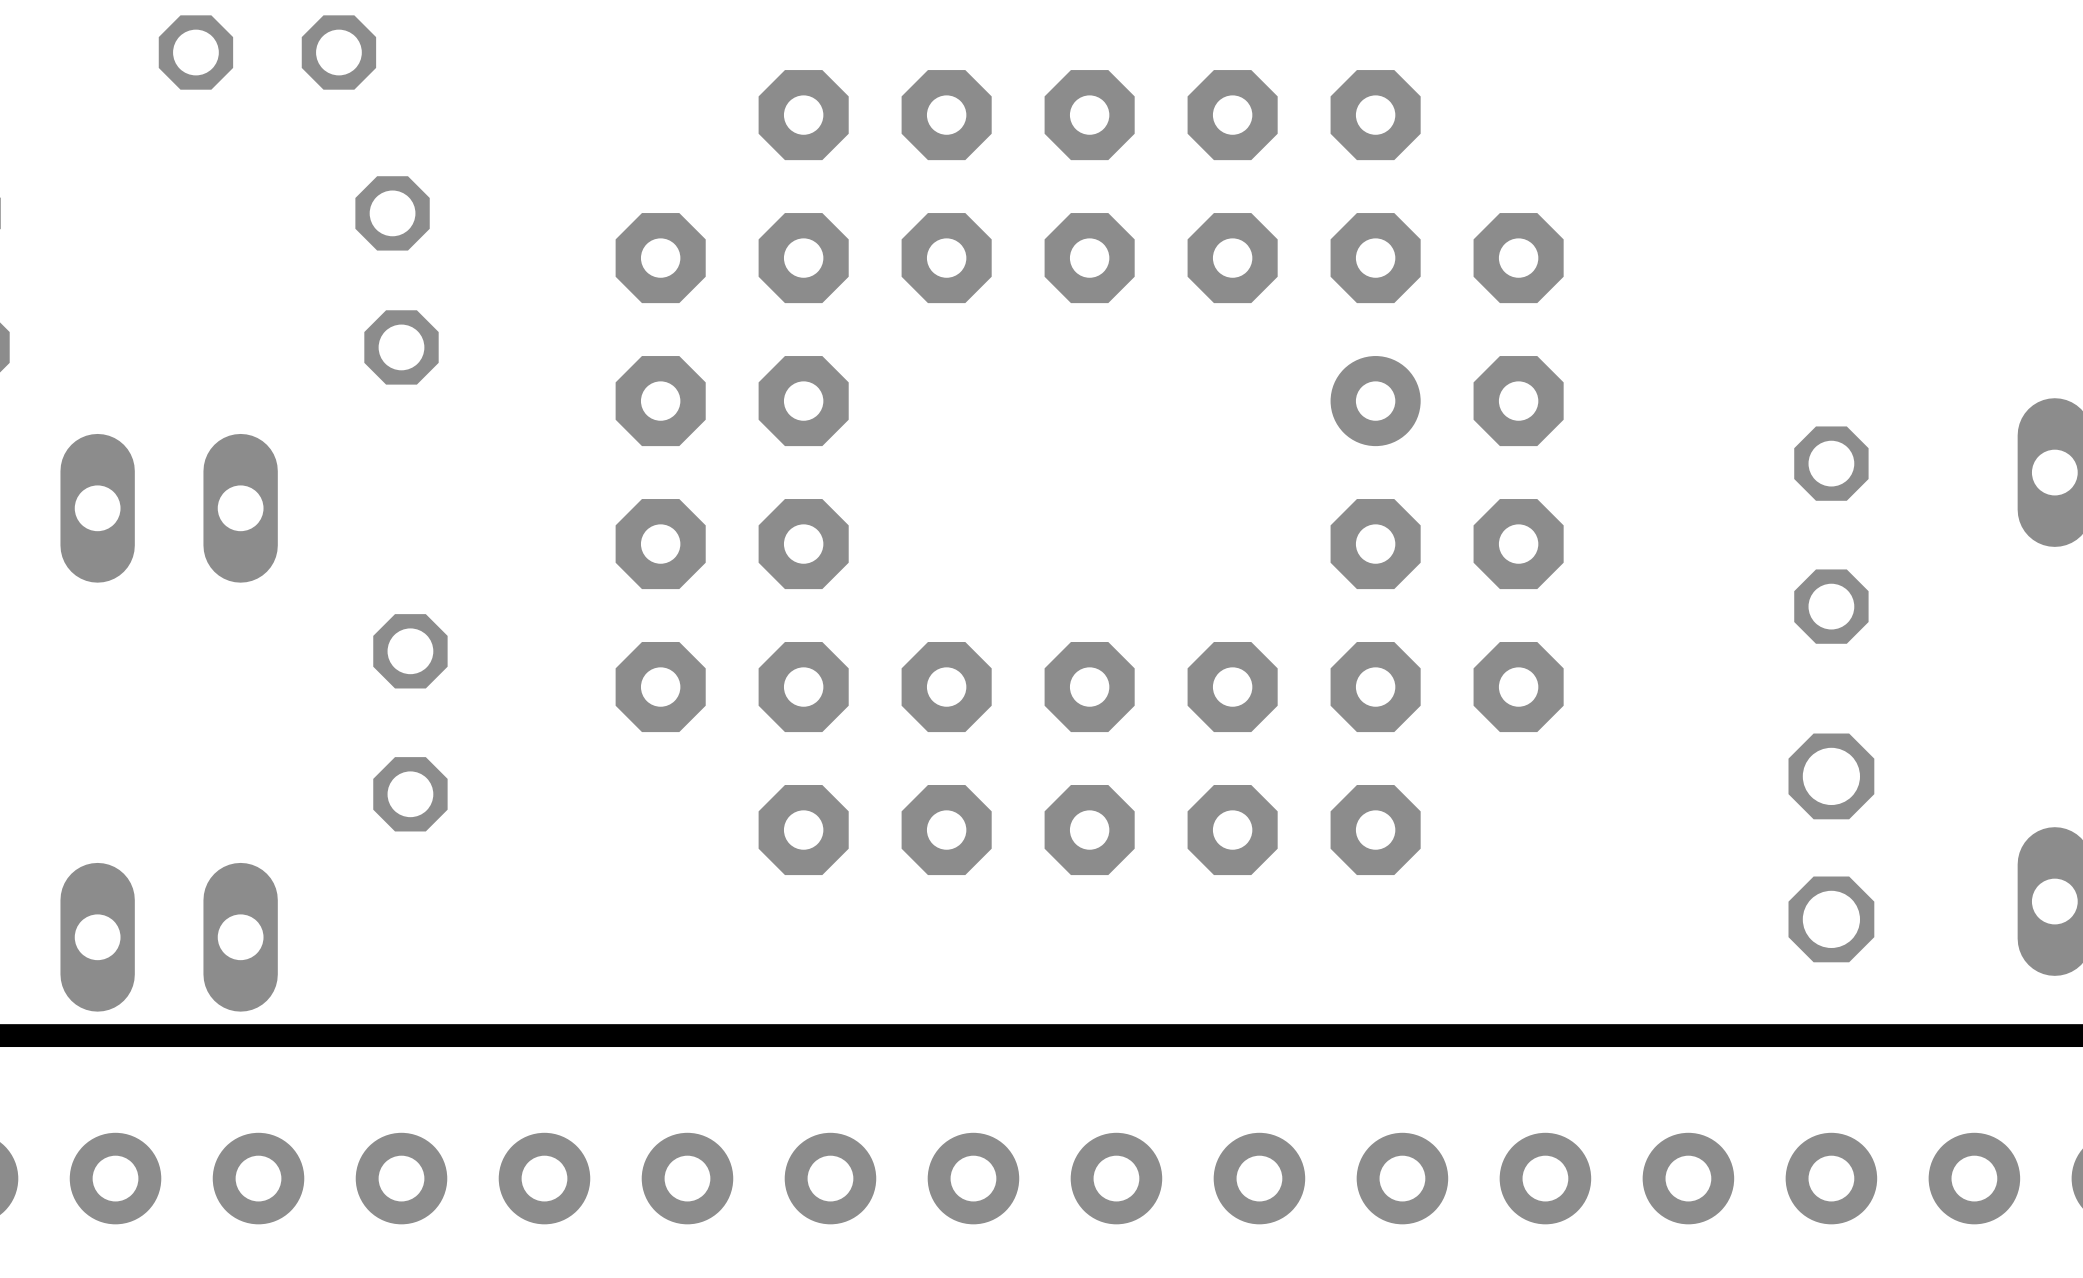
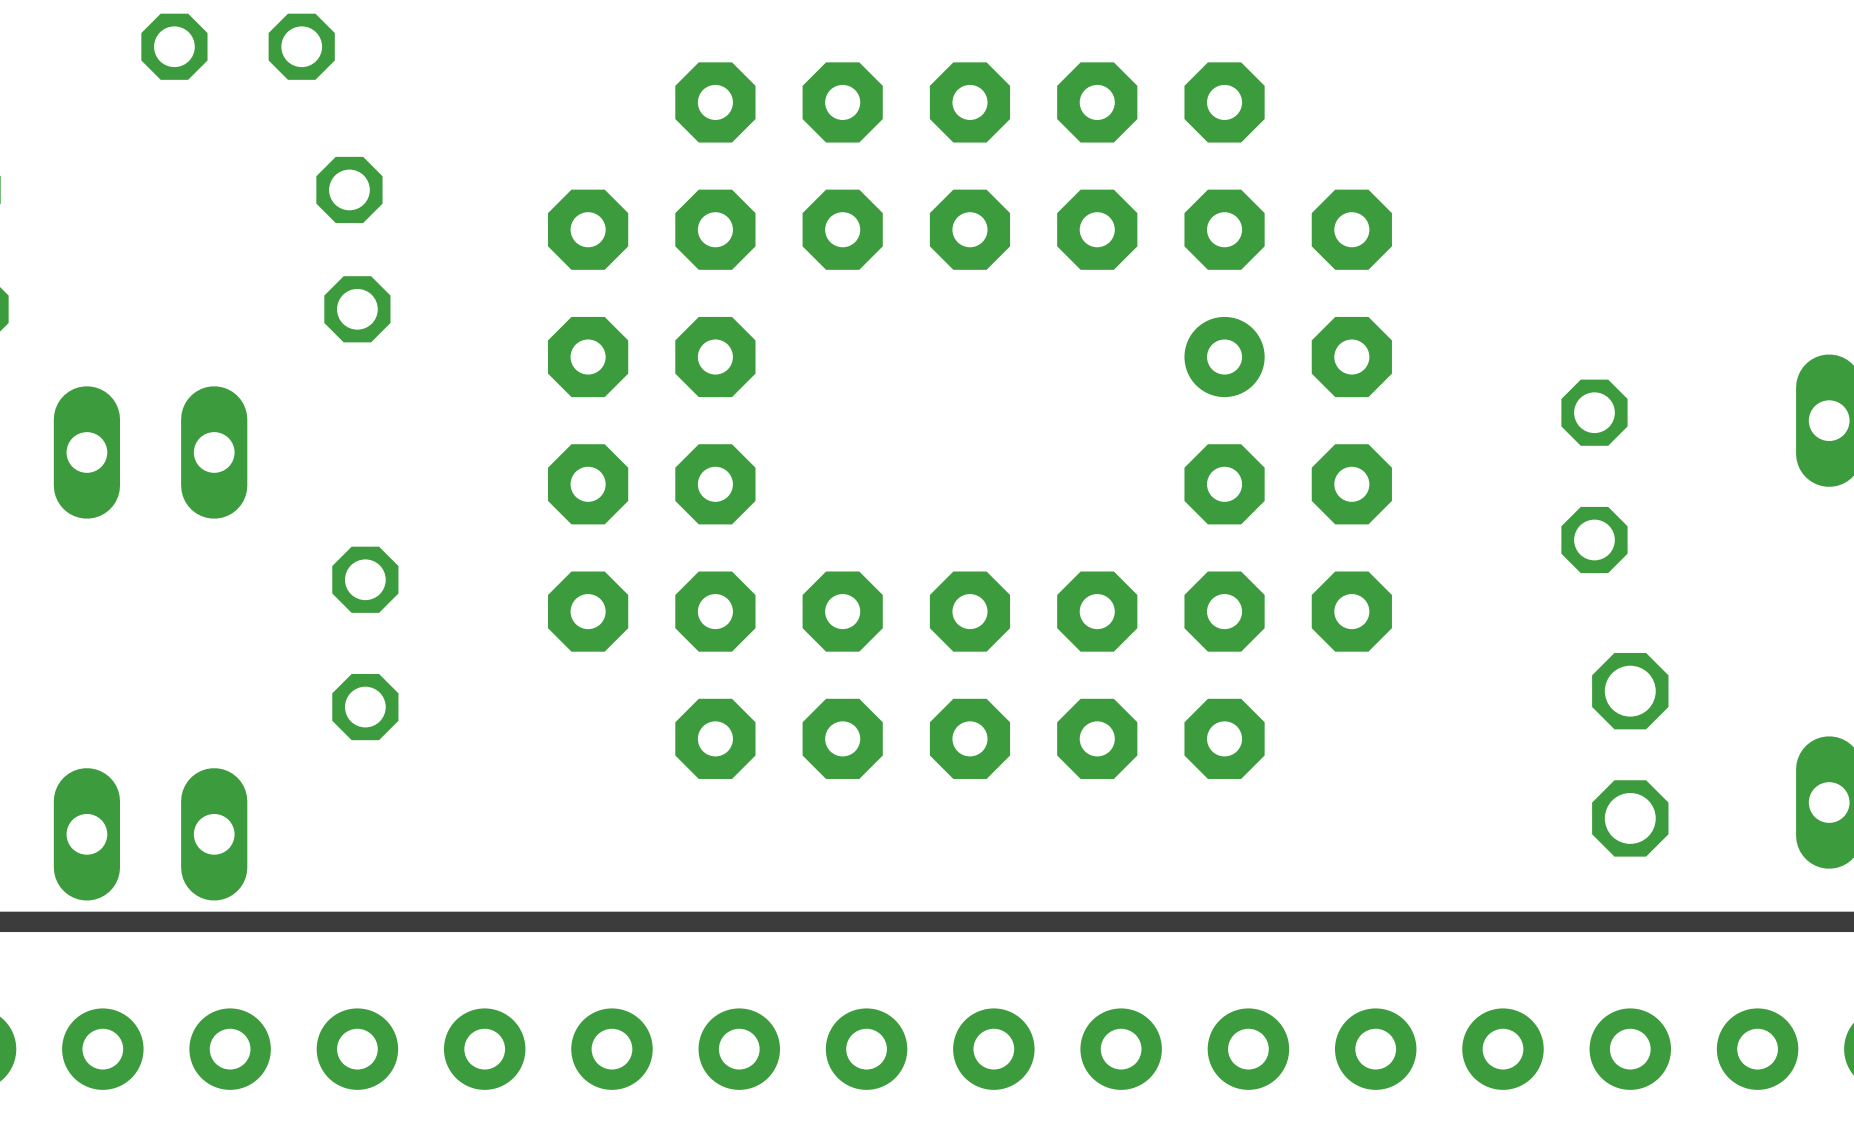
part position: (1831, 535) -> (1594, 476)

